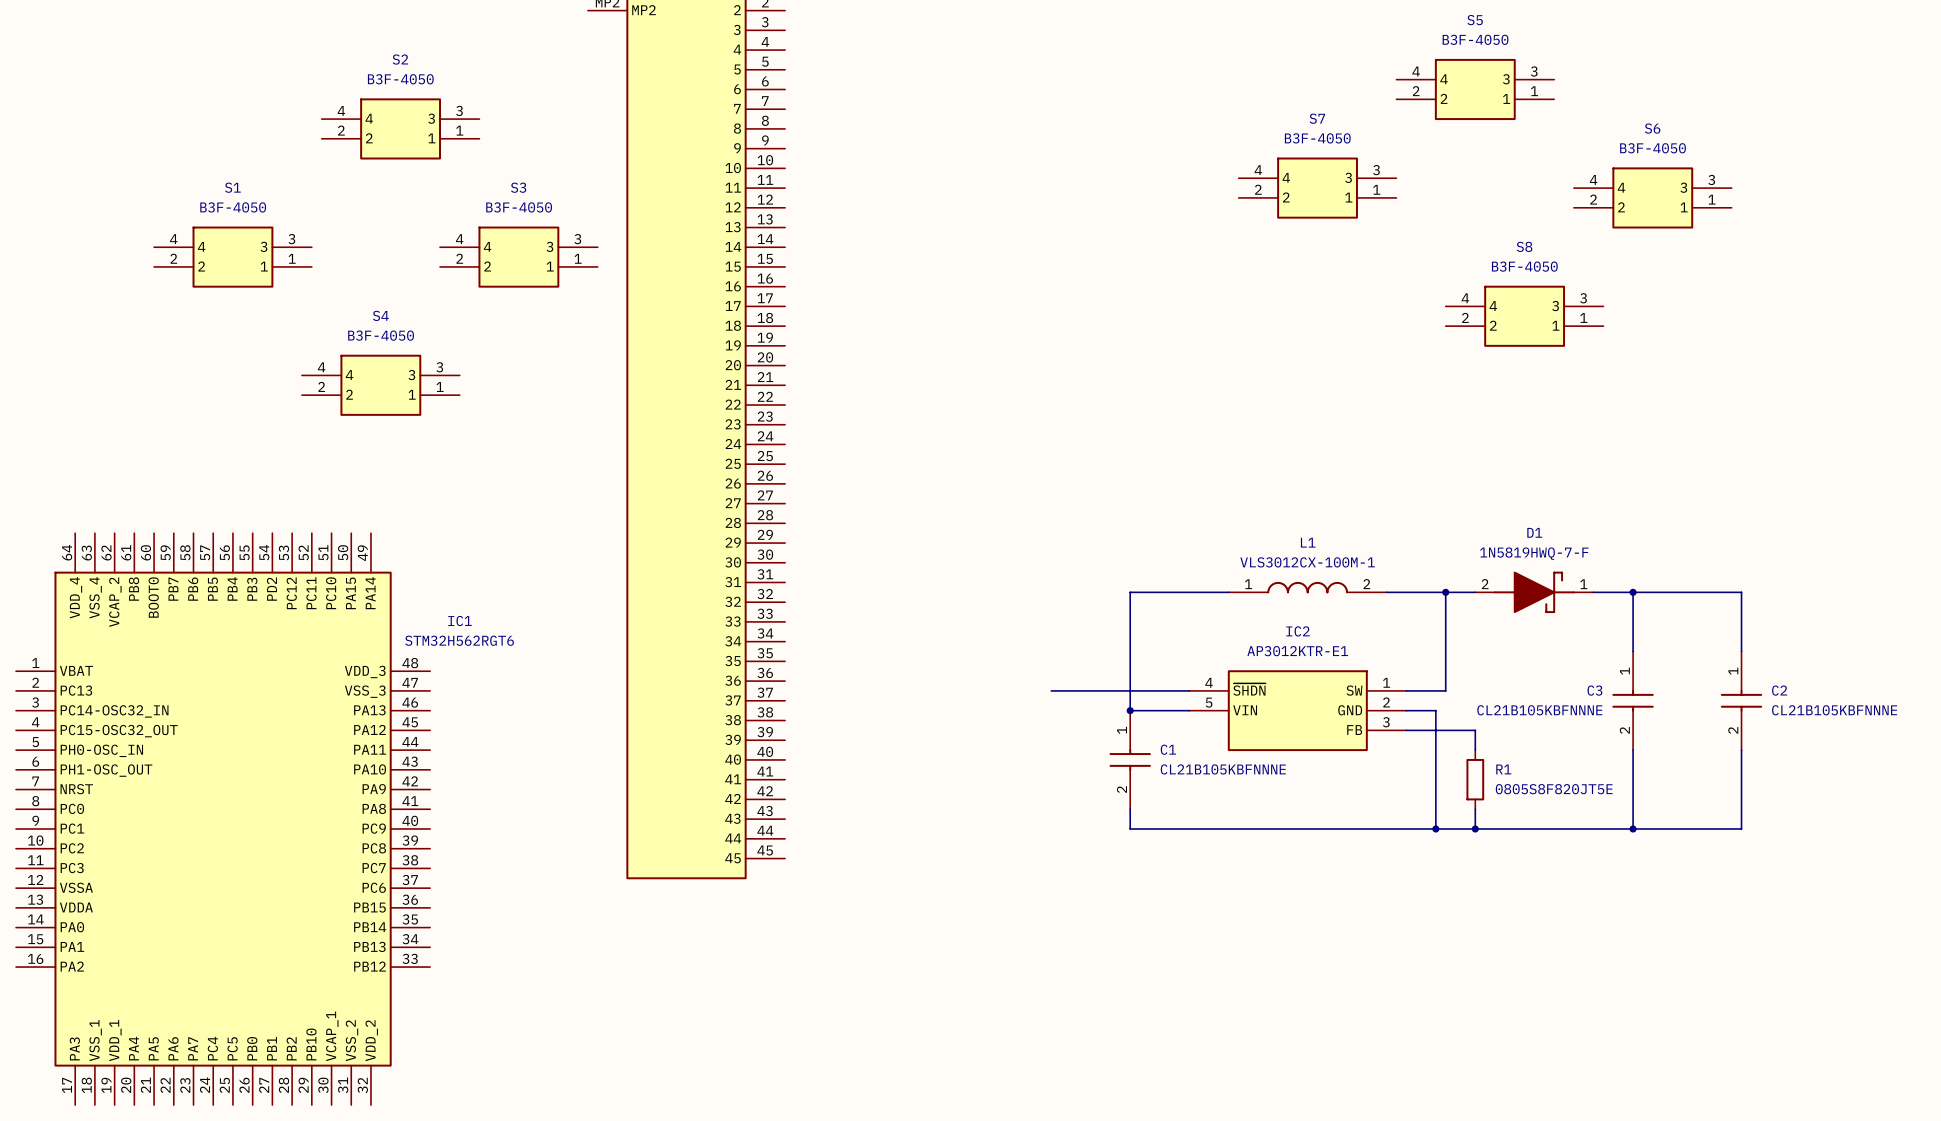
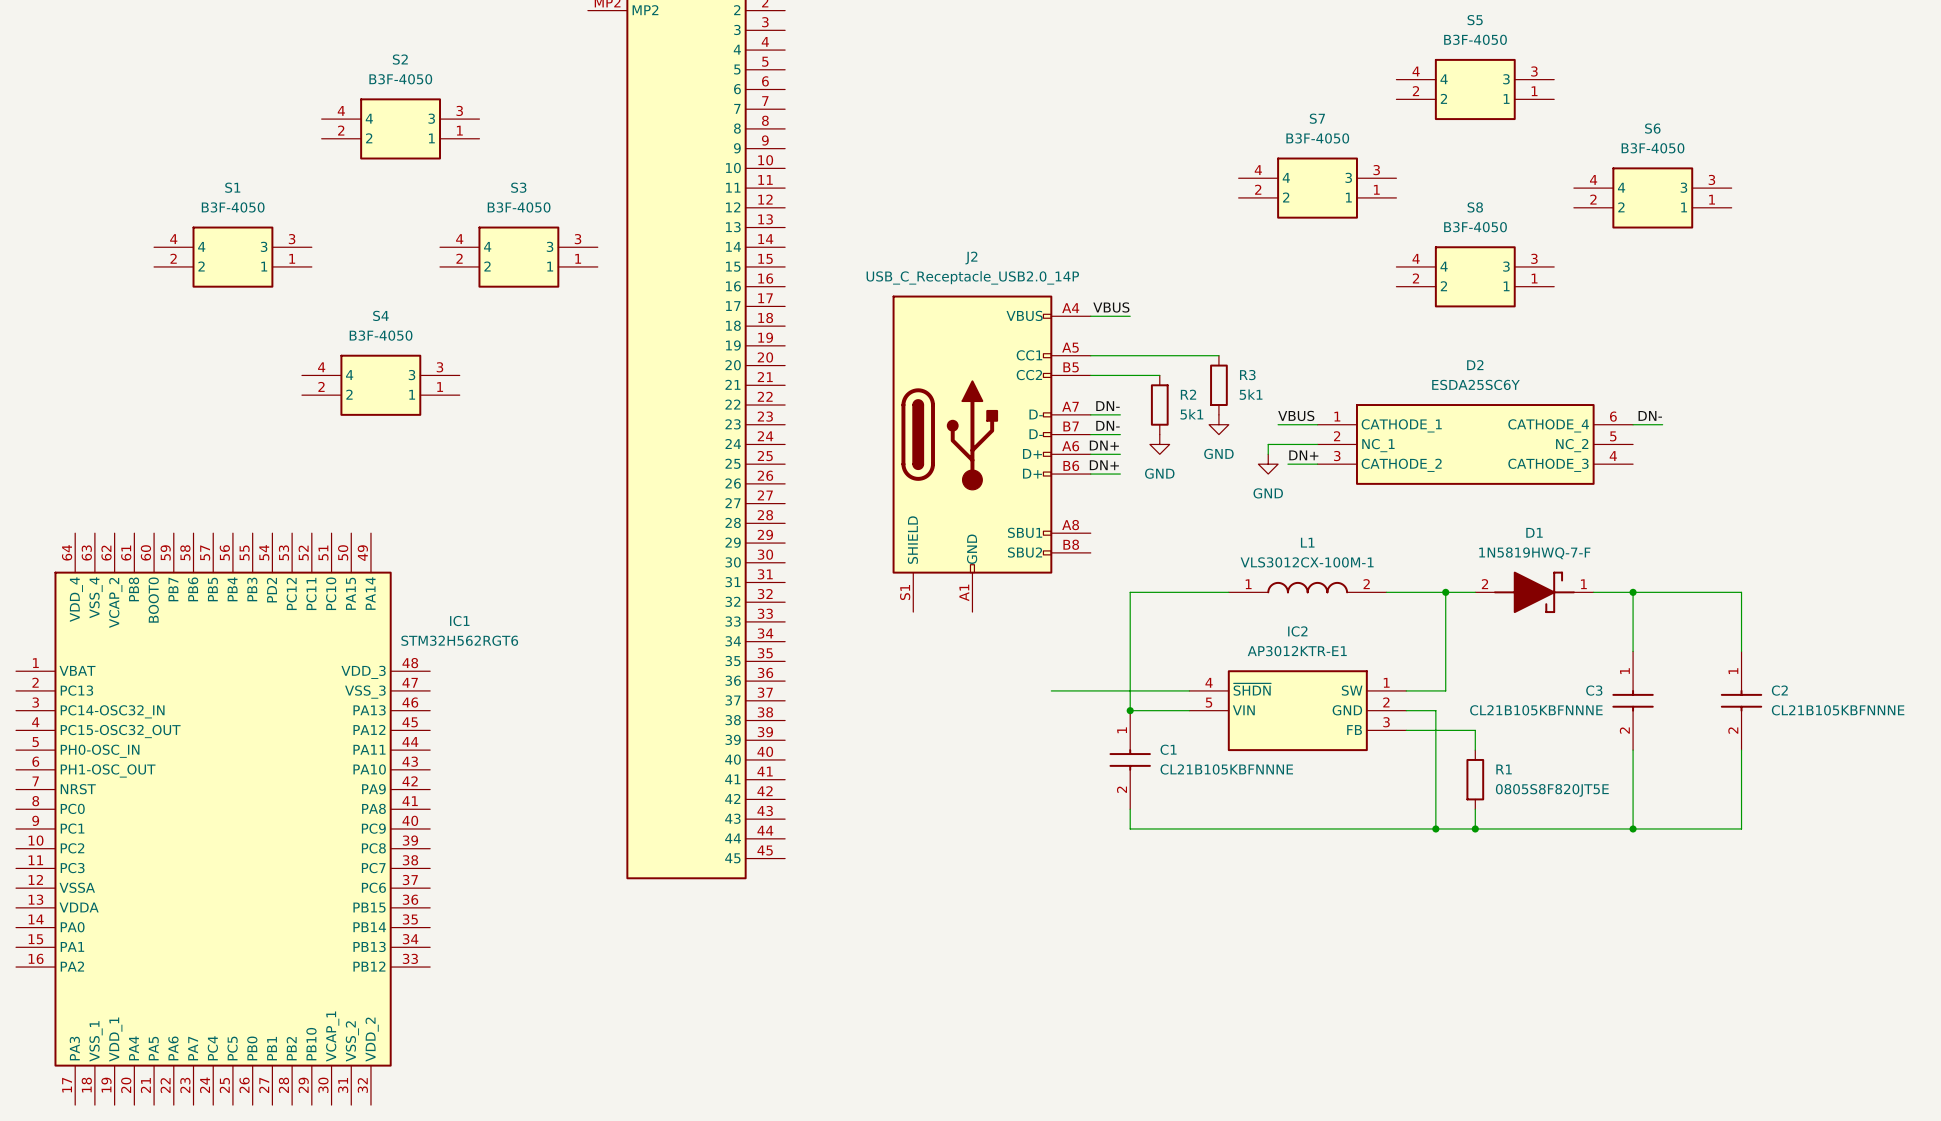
label: none -> VBUS (1111, 307)
wire: none -> (1090, 316) (1130, 316)
S8 position: (1524, 316) -> (1475, 276)
wire: none -> (1090, 355) (1218, 355)
wire: none -> (1090, 375) (1159, 375)
R3: none -> 5k1 (1218, 385)
R2: none -> 5k1 (1159, 405)
label: none -> DN- (1107, 406)
wire: none -> (1090, 414) (1120, 414)
label: none -> VBUS (1296, 415)
label: none -> DN- (1650, 415)
power symbol: none -> GND (1218, 424)
wire: none -> (1278, 424) (1317, 424)
wire: none -> (1633, 424) (1662, 424)
label: none -> DN- (1107, 425)
wire: none -> (1090, 434) (1120, 434)
power symbol: none -> GND (1159, 444)
wire: none -> (1317, 444) (1268, 444) (1268, 454)
D2: none -> ESDA25SC6Y (1475, 444)
label: none -> DN+ (1104, 445)
J2: none -> USB_C_Receptacle_USB2.0_14P (991, 453)
wire: none -> (1090, 454) (1120, 454)
label: none -> DN+ (1303, 455)
power symbol: none -> GND (1268, 464)
wire: none -> (1287, 464) (1317, 464)
label: none -> DN+ (1104, 465)
wire: none -> (1090, 474) (1120, 474)

